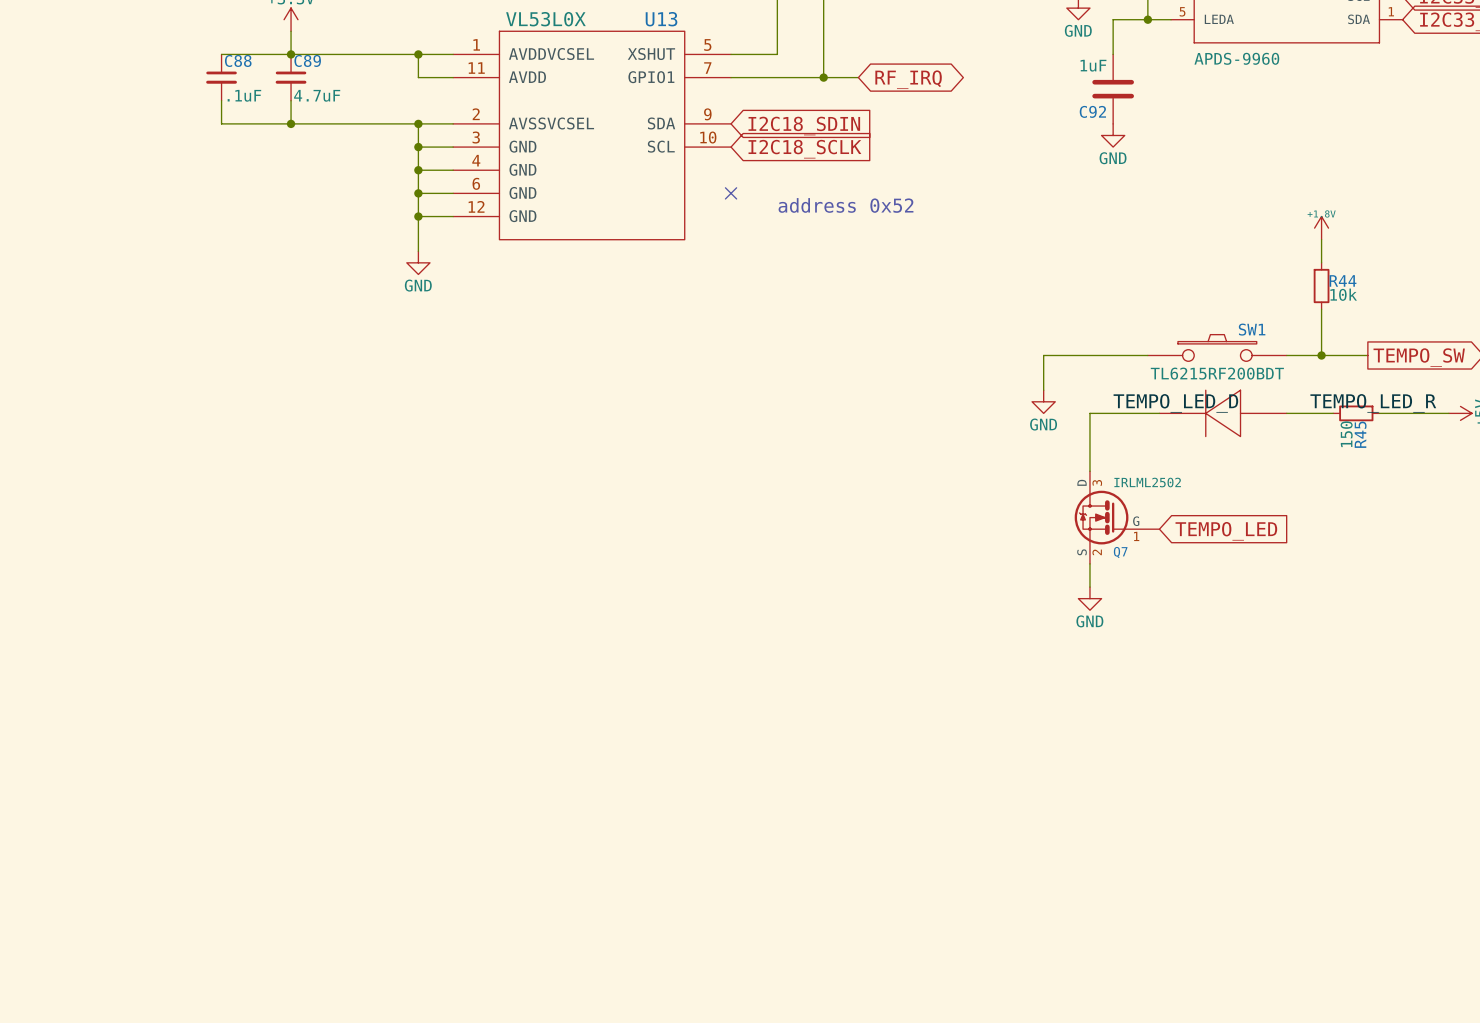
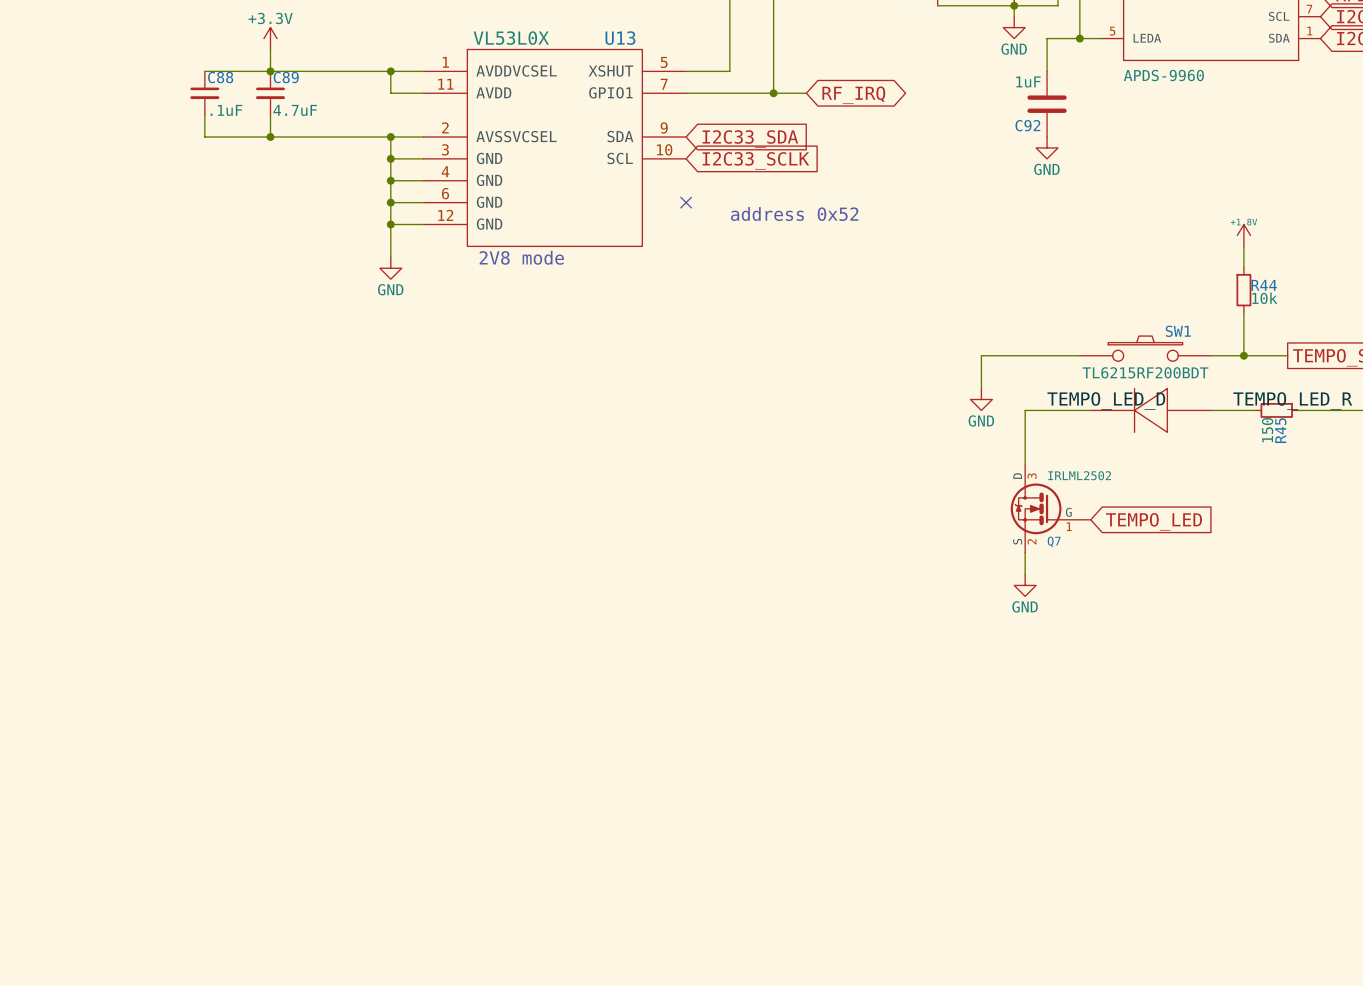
global label: I2C18_SDIN (804, 126) -> I2C33_SDA (750, 139)
global label: I2C18_SCLK (804, 149) -> I2C33_SCLK (755, 160)
text: none -> 2V8 mode (521, 257)

